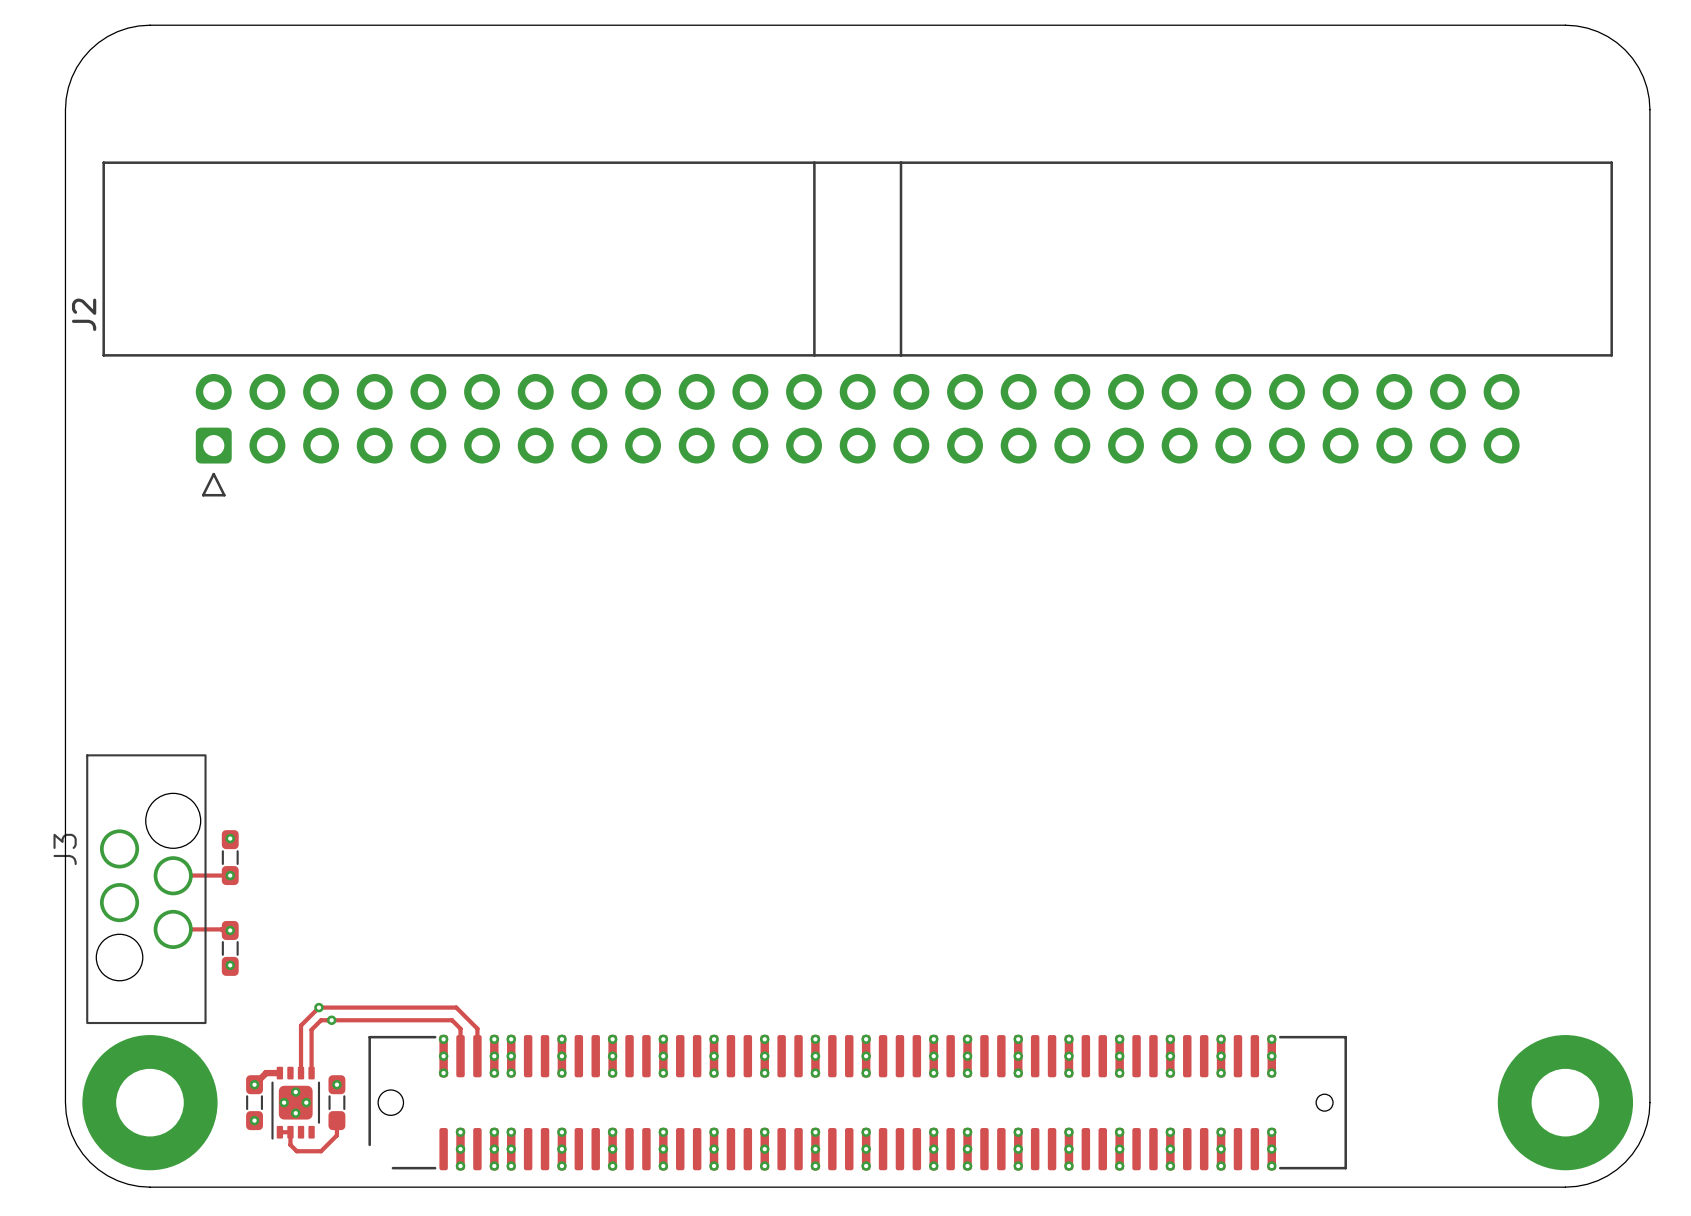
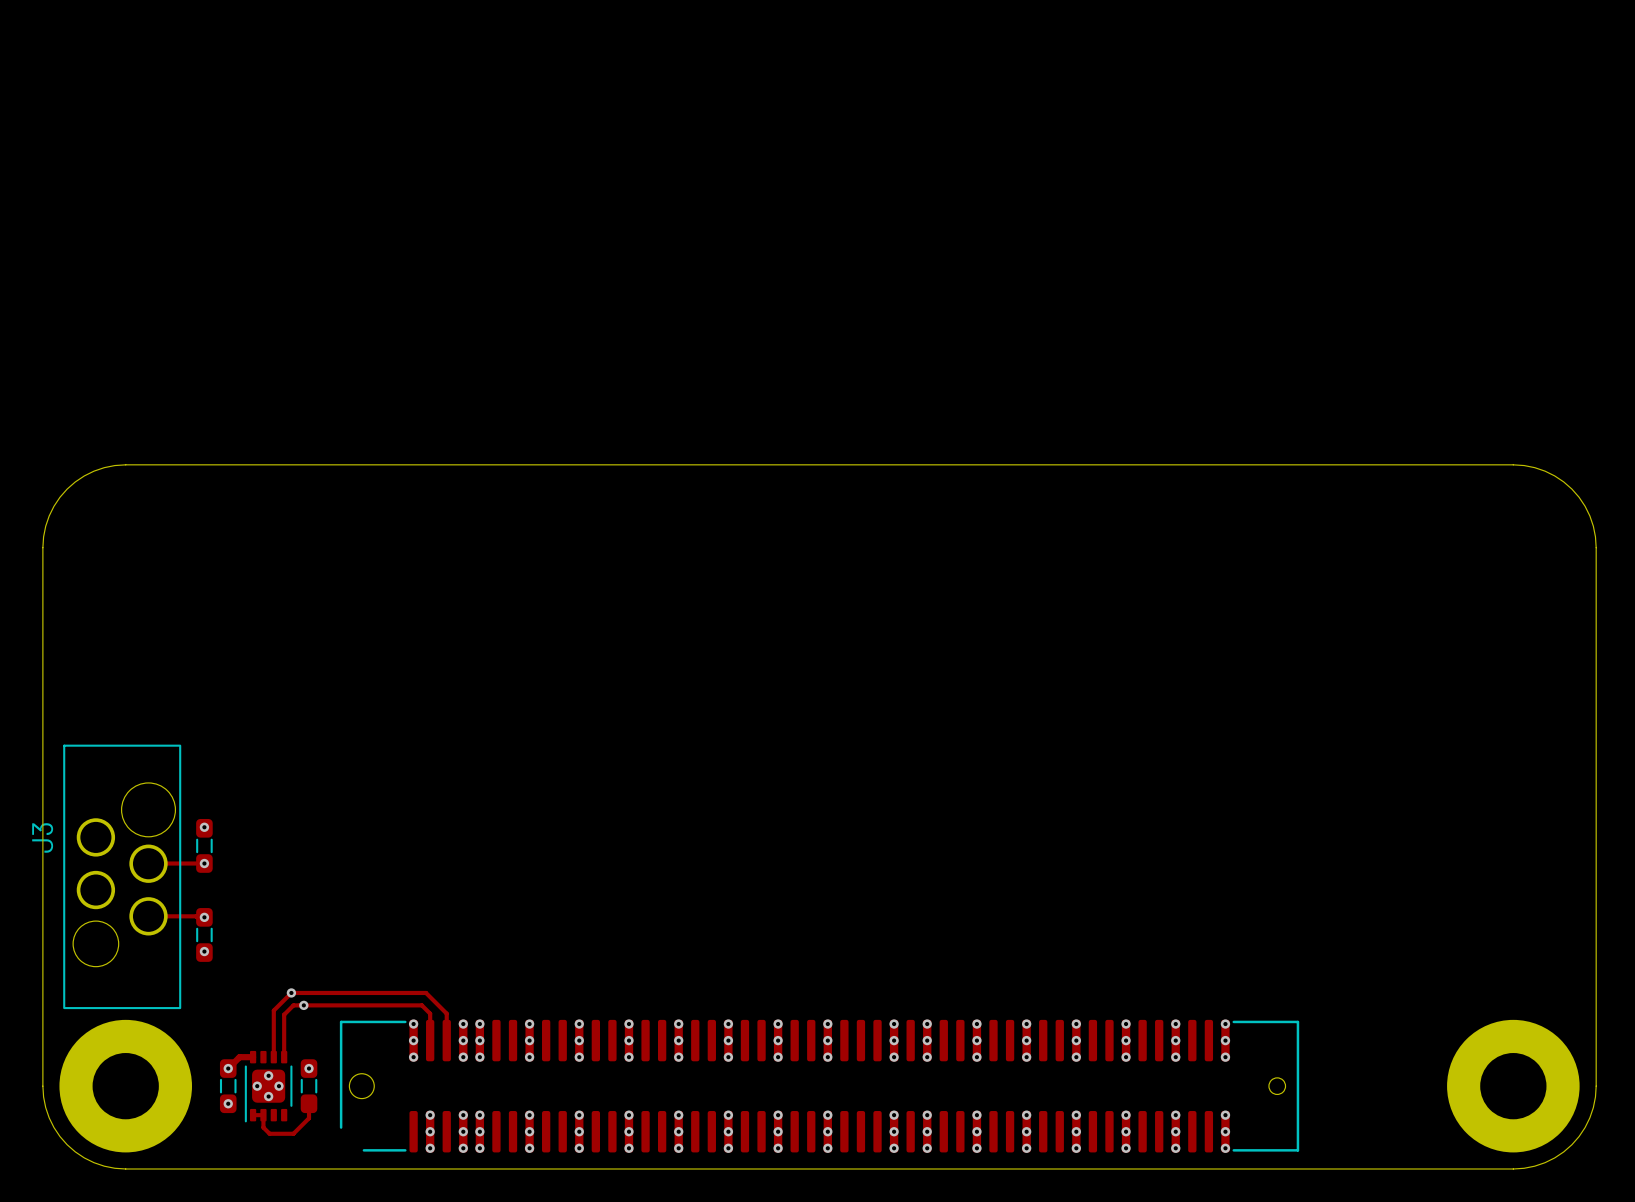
J2: (857, 328) -> none
board edge: (65, 553) (66, 98) (76, 67) (90, 49) (117, 31) (149, 25) (1565, 25) (1597, 31) (1616, 42) (1632, 58) (1643, 77) (1649, 98) (1649, 553) -> (42, 547) (49, 515) (67, 489) (94, 471) (125, 464) (1513, 464) (1545, 471) (1571, 489) (1589, 515) (1596, 547)

